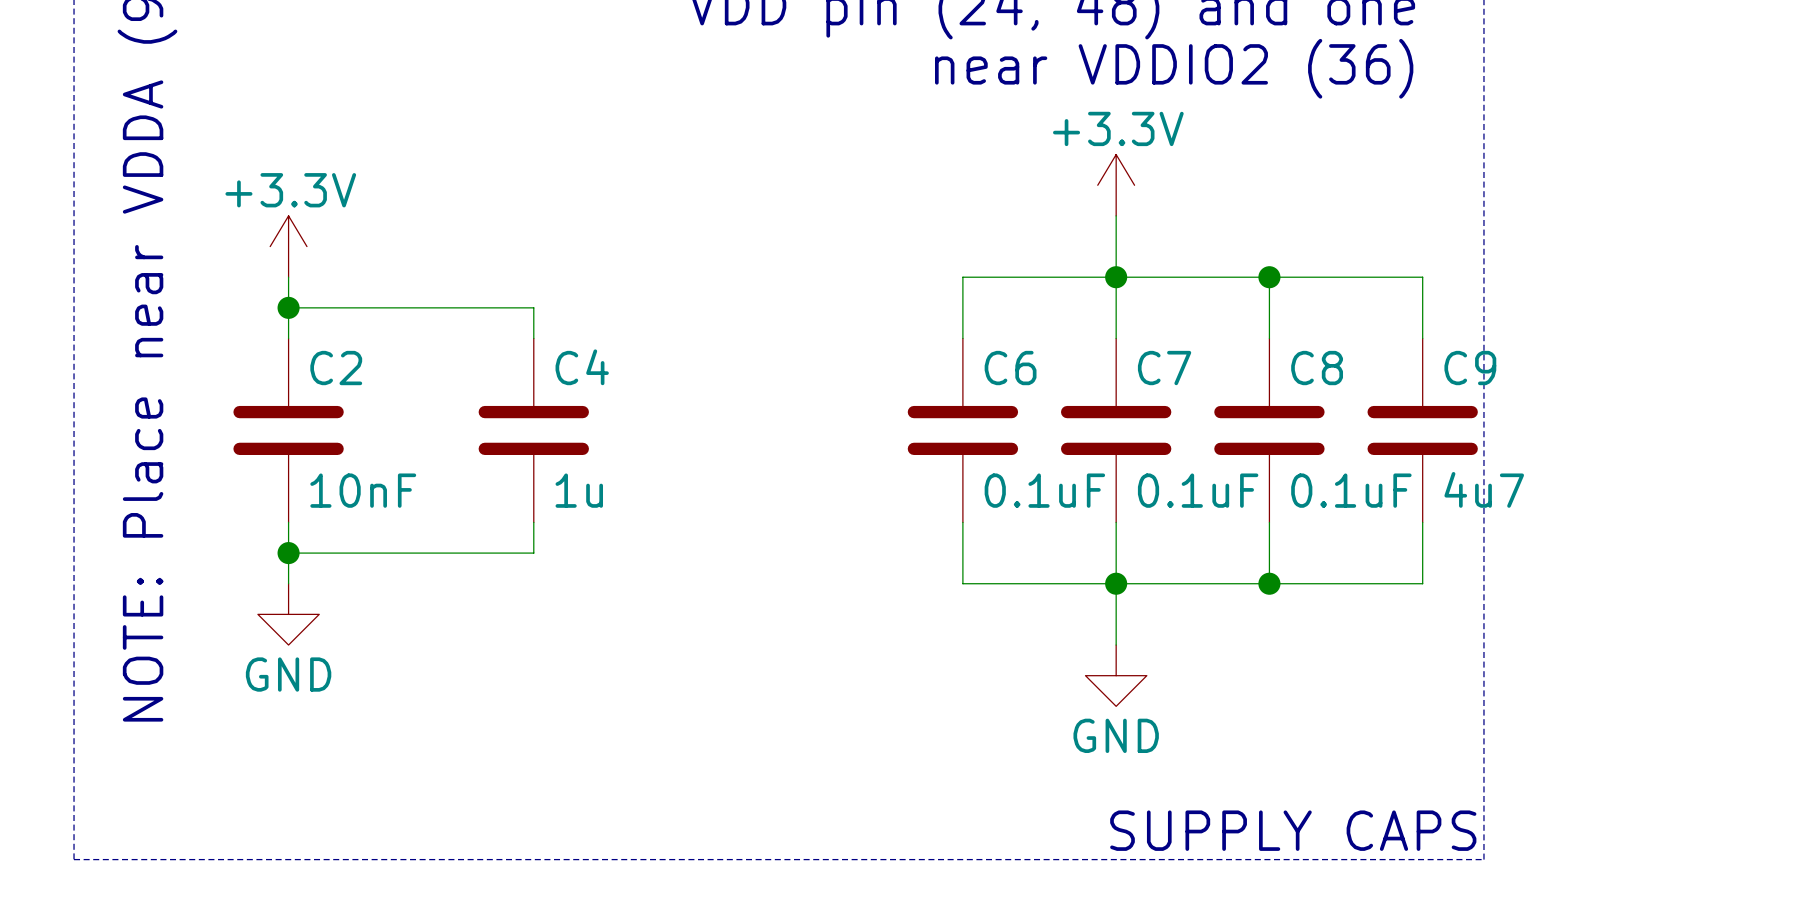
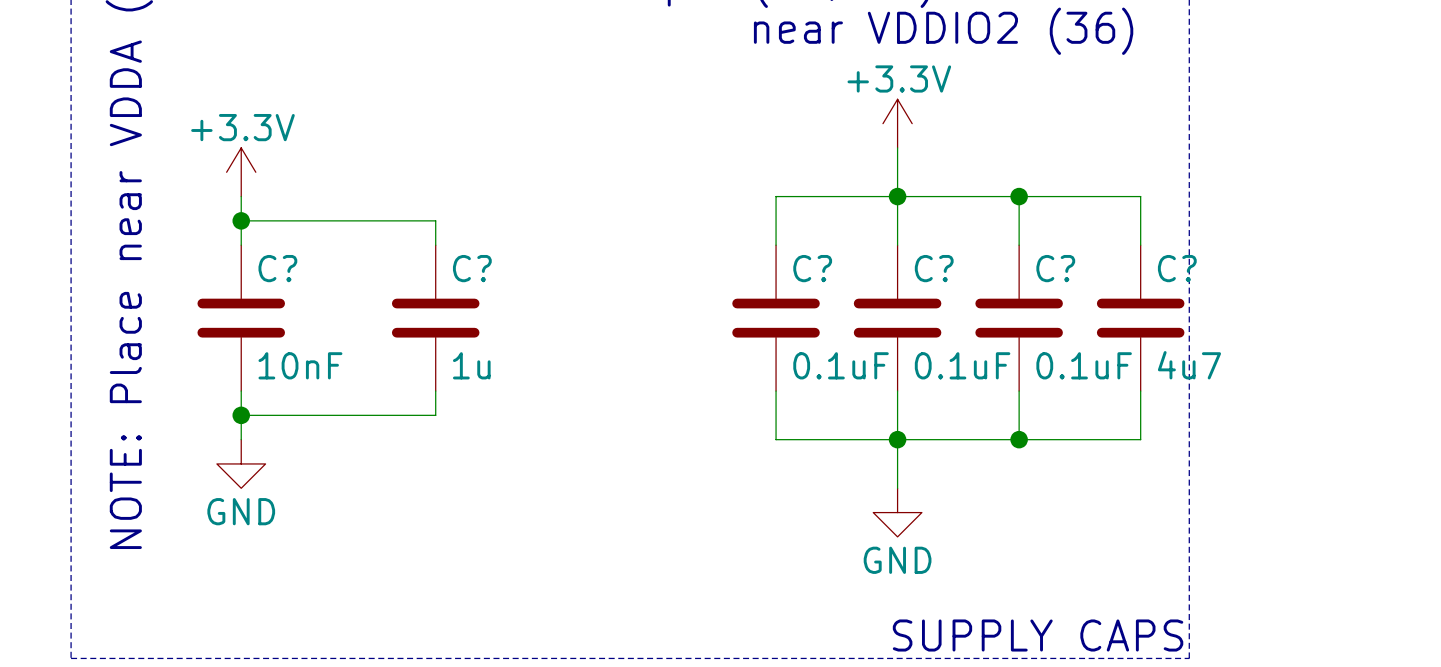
C4 name: C4 (582, 367) -> C? (472, 268)
C2 name: C2 (336, 368) -> C? (277, 268)
C6 name: C6 (1010, 368) -> C? (812, 268)
C7 name: C7 (1164, 368) -> C? (934, 268)
C8 name: C8 (1317, 368) -> C? (1055, 268)
C9 name: C9 (1470, 368) -> C? (1177, 268)

